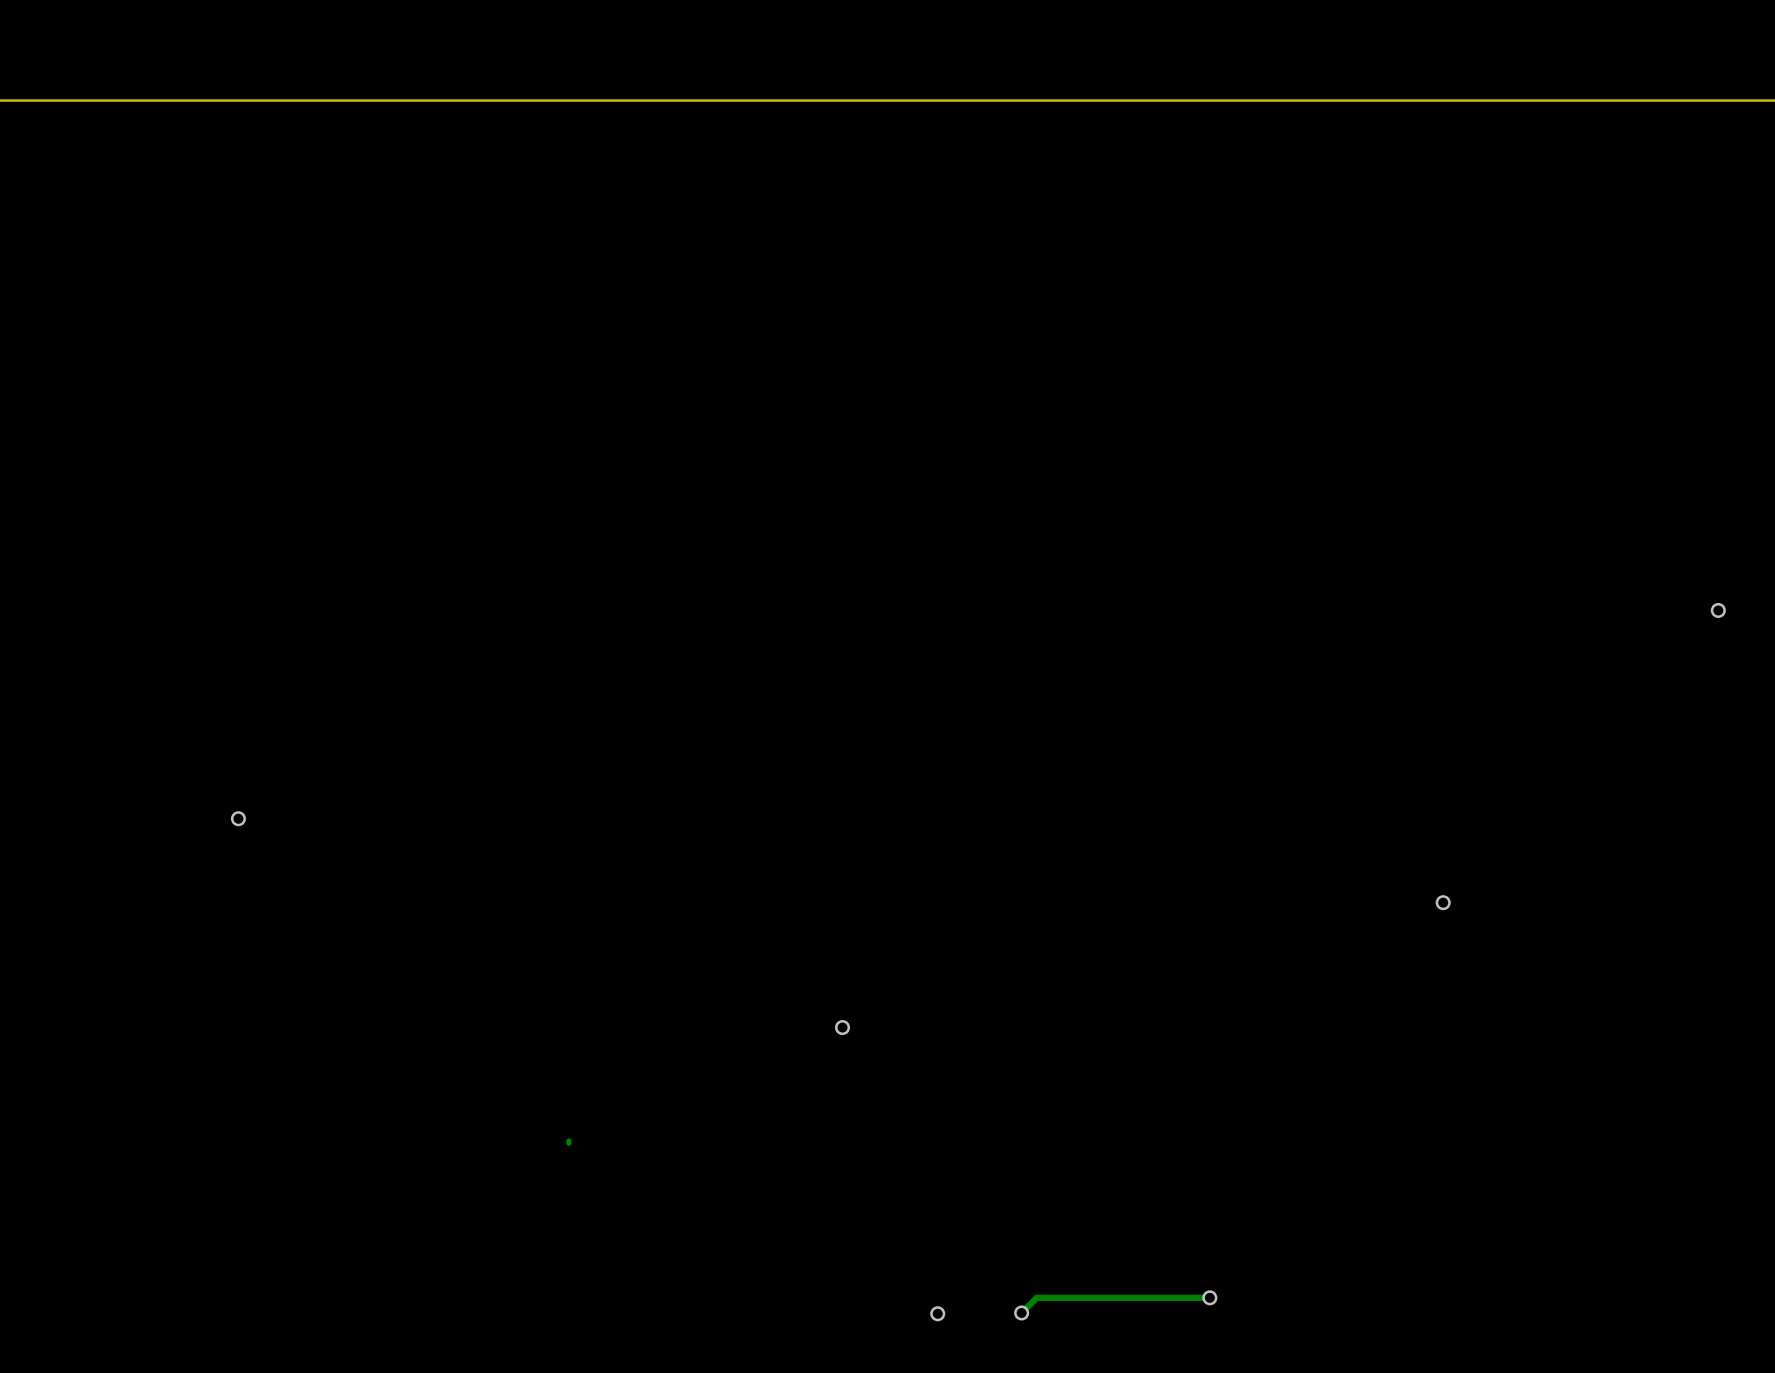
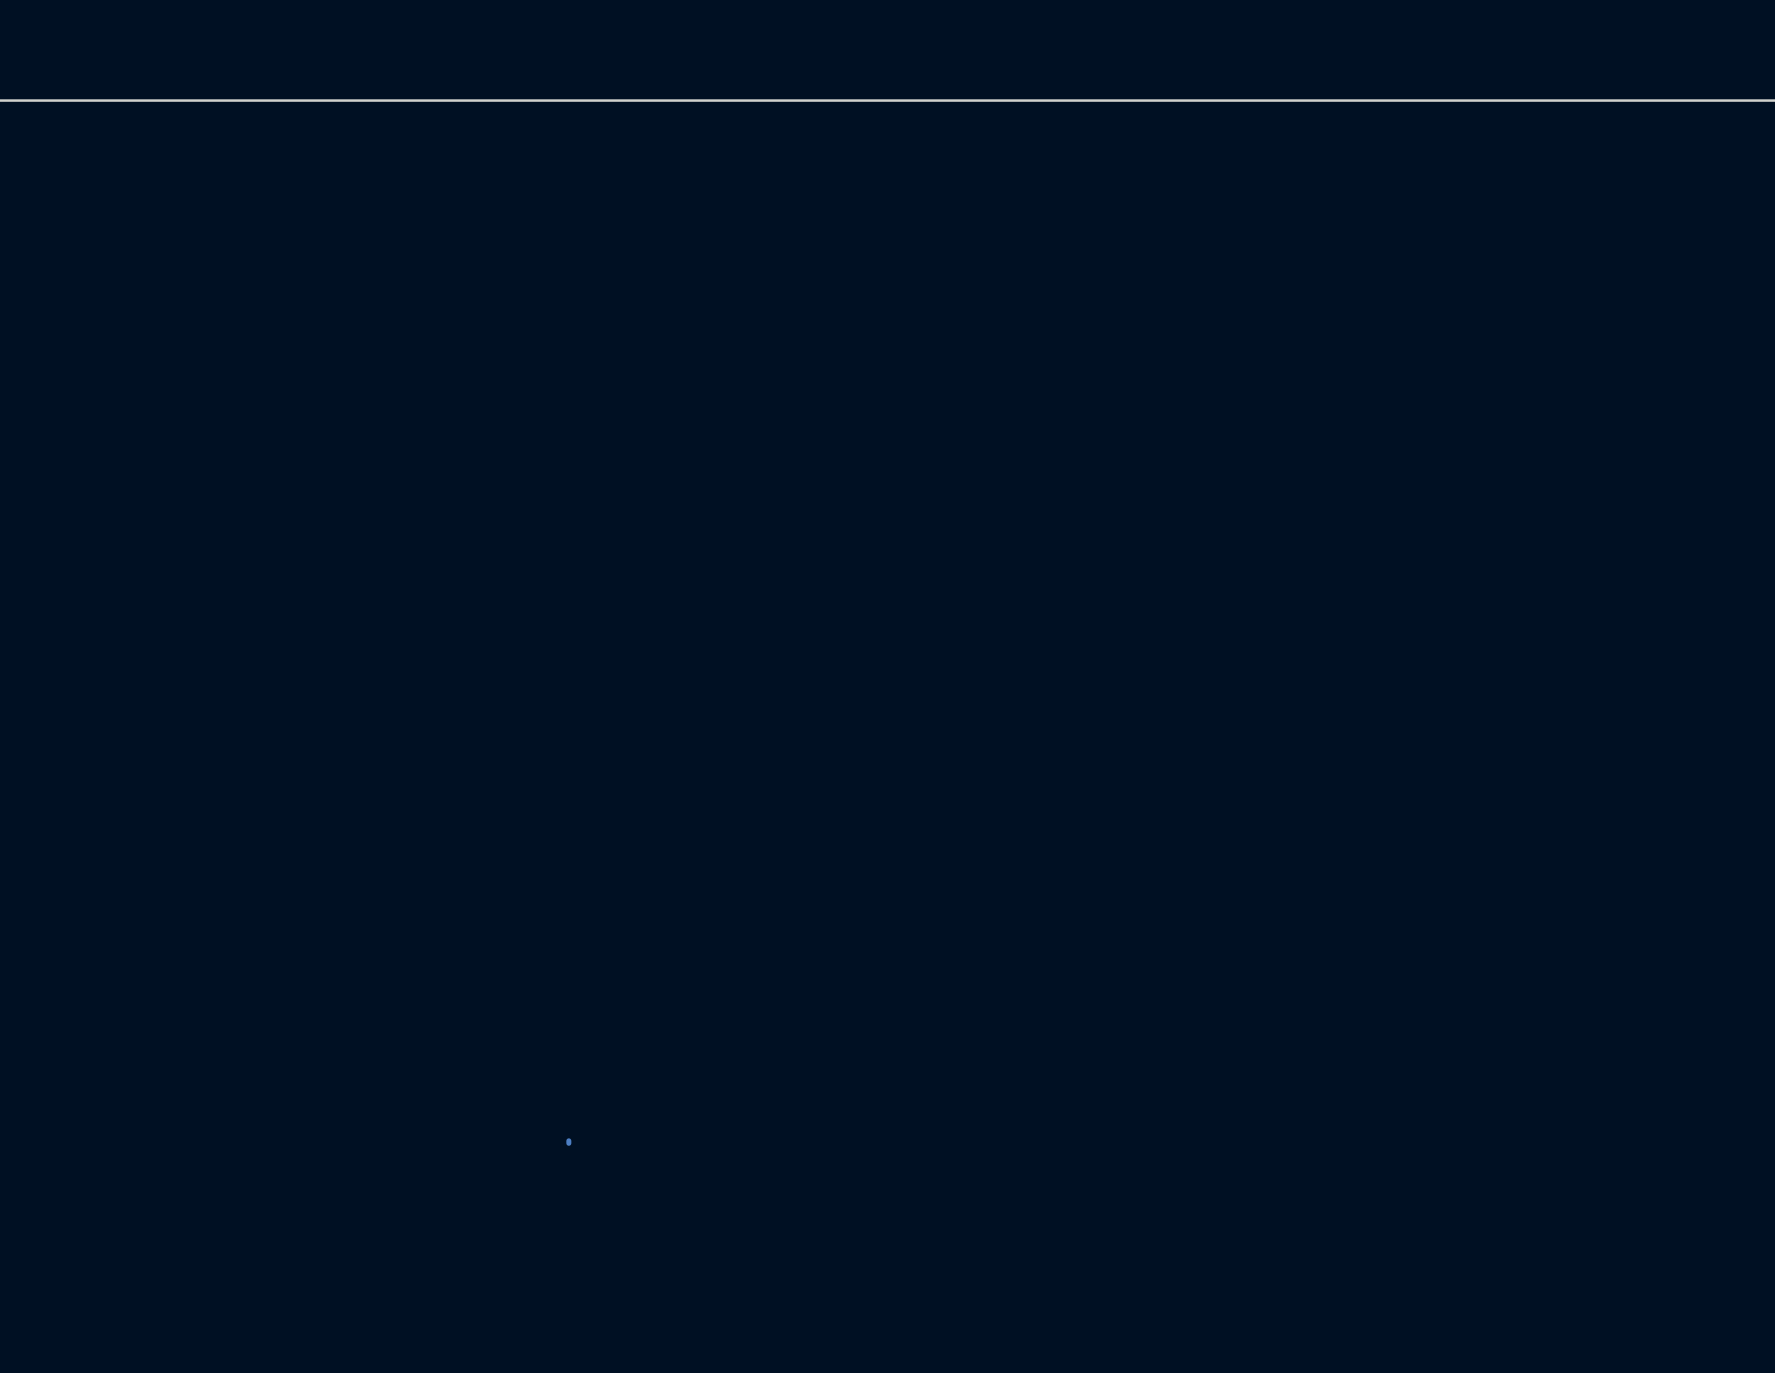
via: (1718, 610) -> none
via: (238, 818) -> none
via: (1443, 902) -> none
via: (842, 1027) -> none
track: (1209, 1297) (1036, 1297) (1021, 1312) -> none
via: (1209, 1297) -> none
via: (1021, 1312) -> none
via: (937, 1313) -> none

